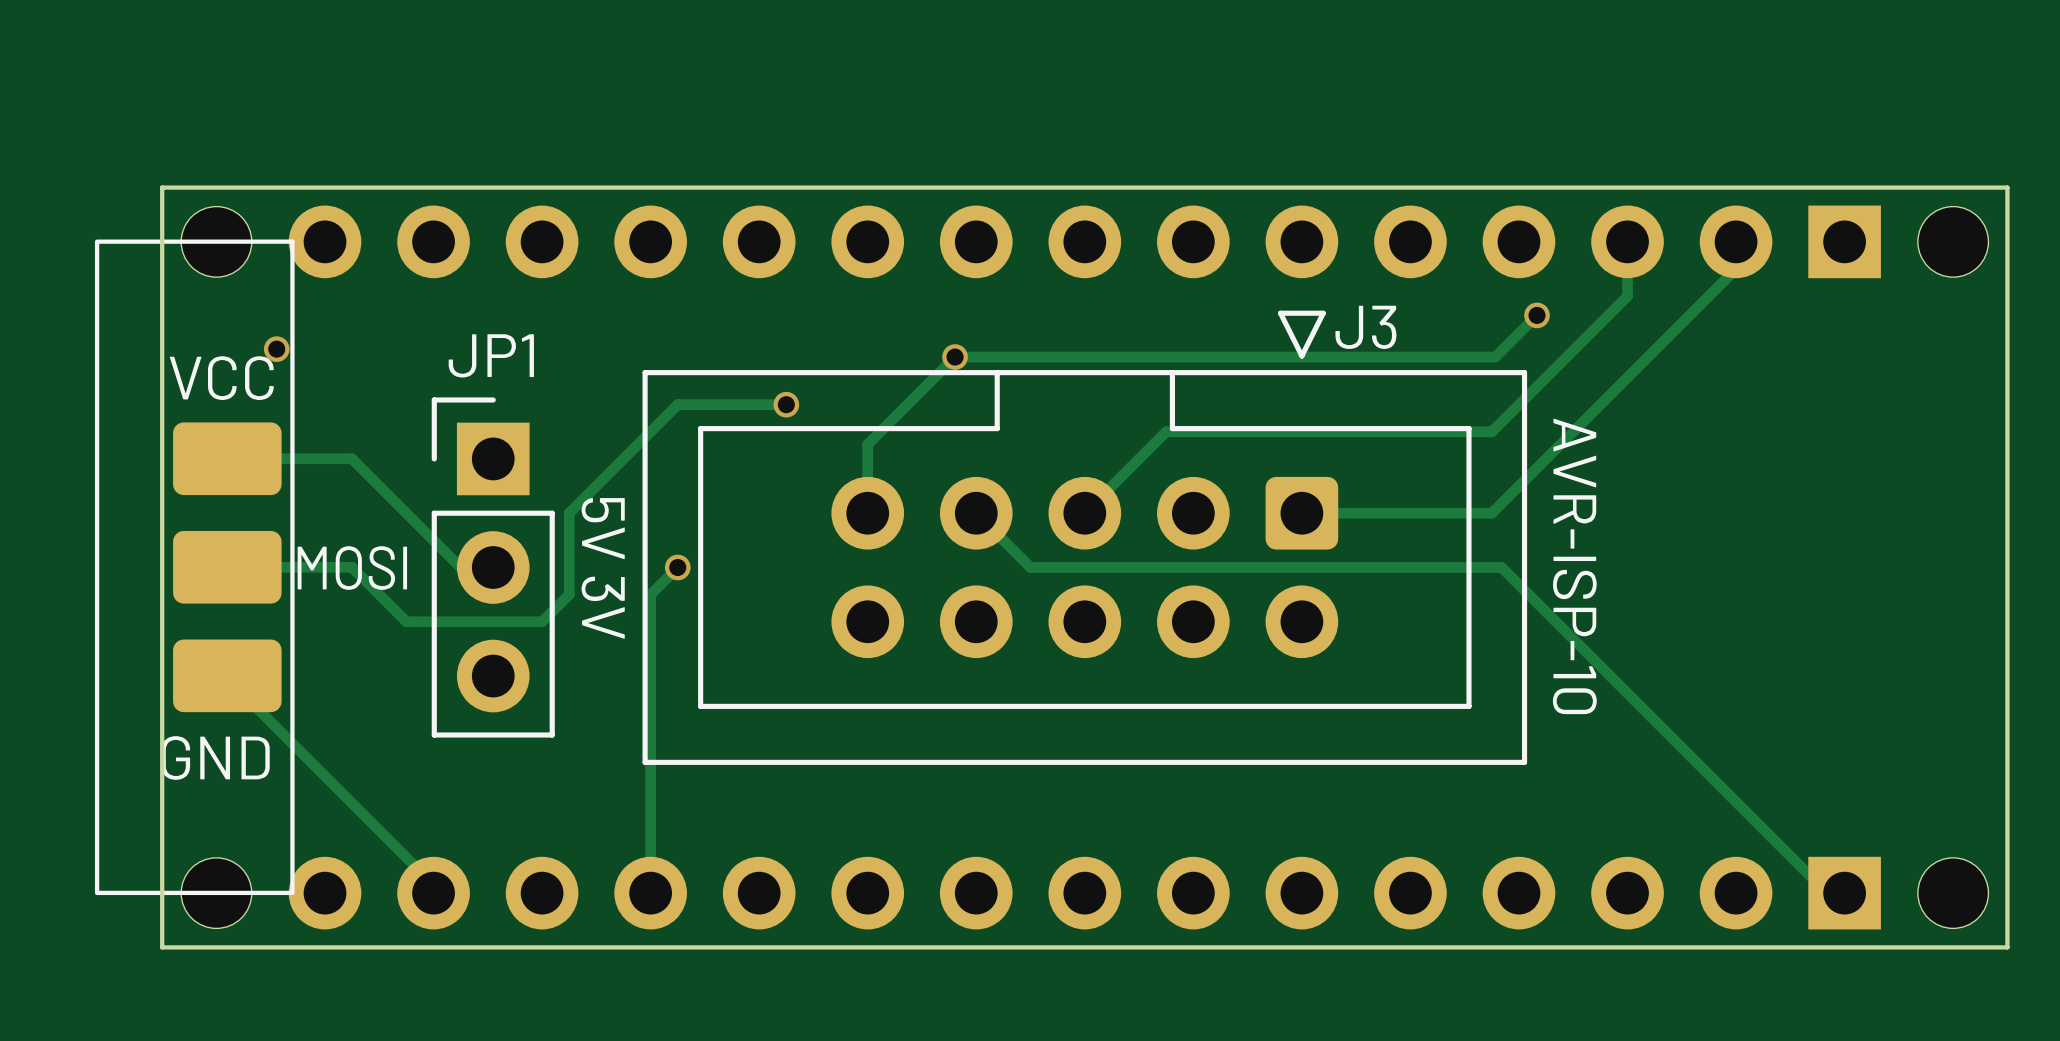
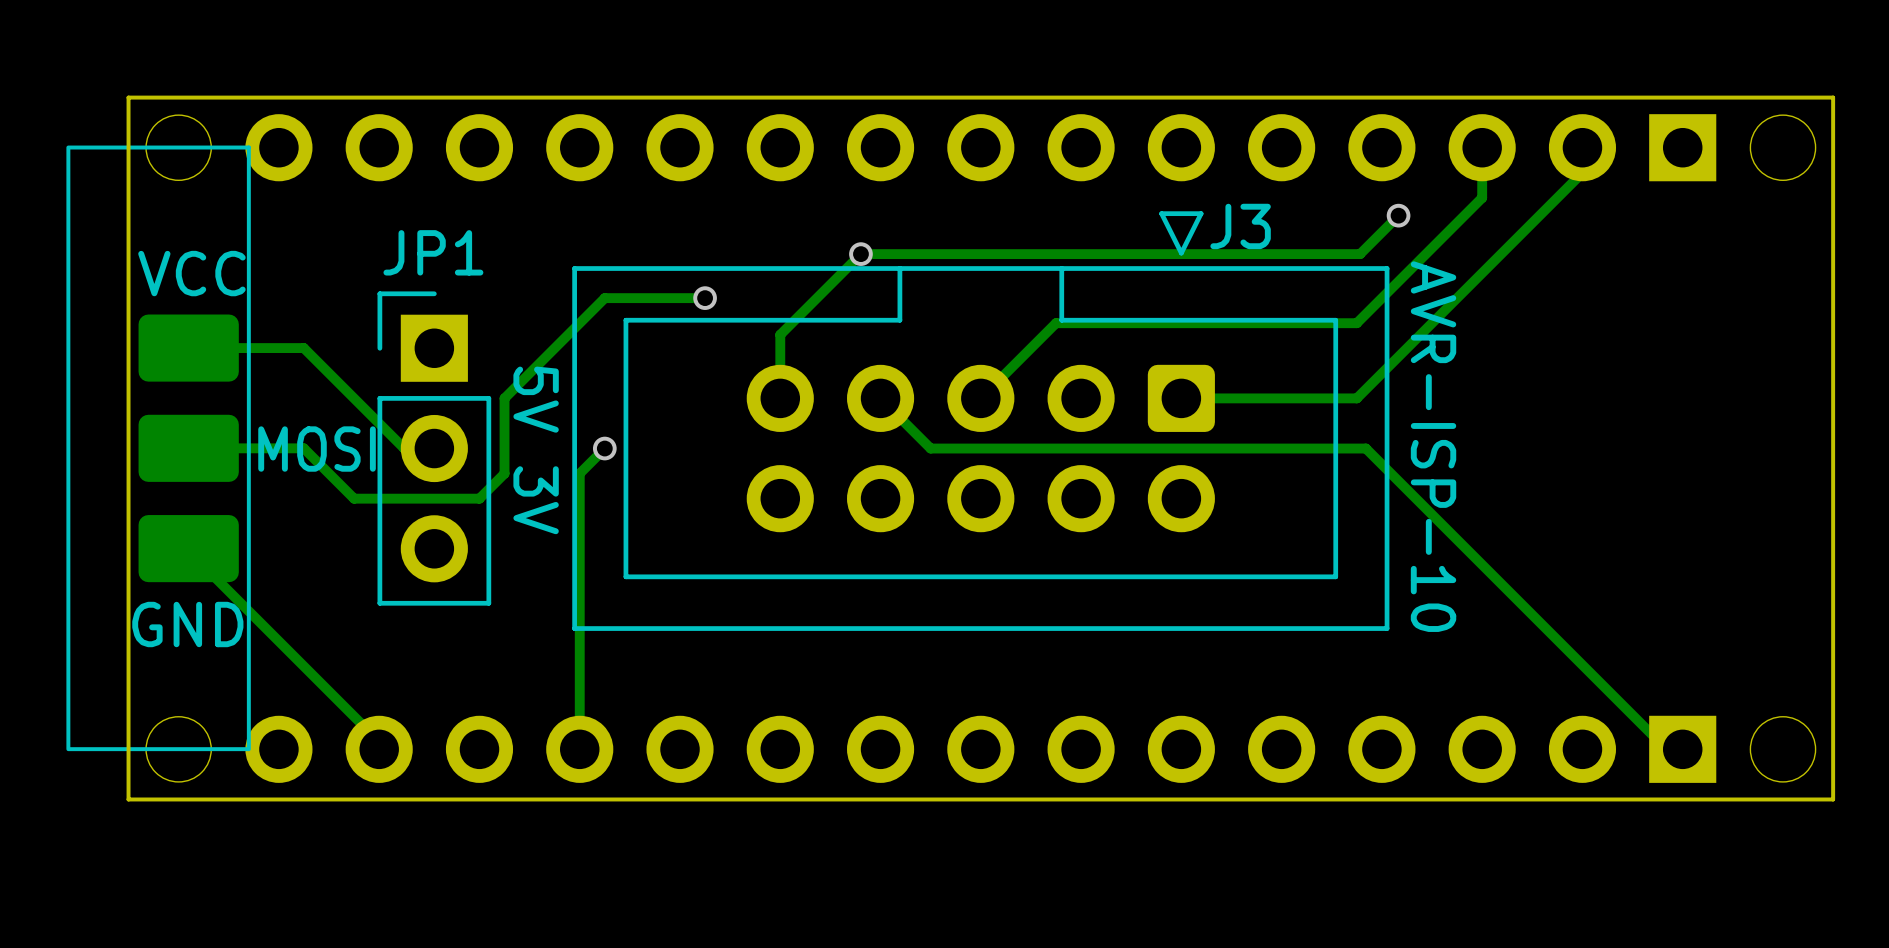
via: (276, 349) -> none

